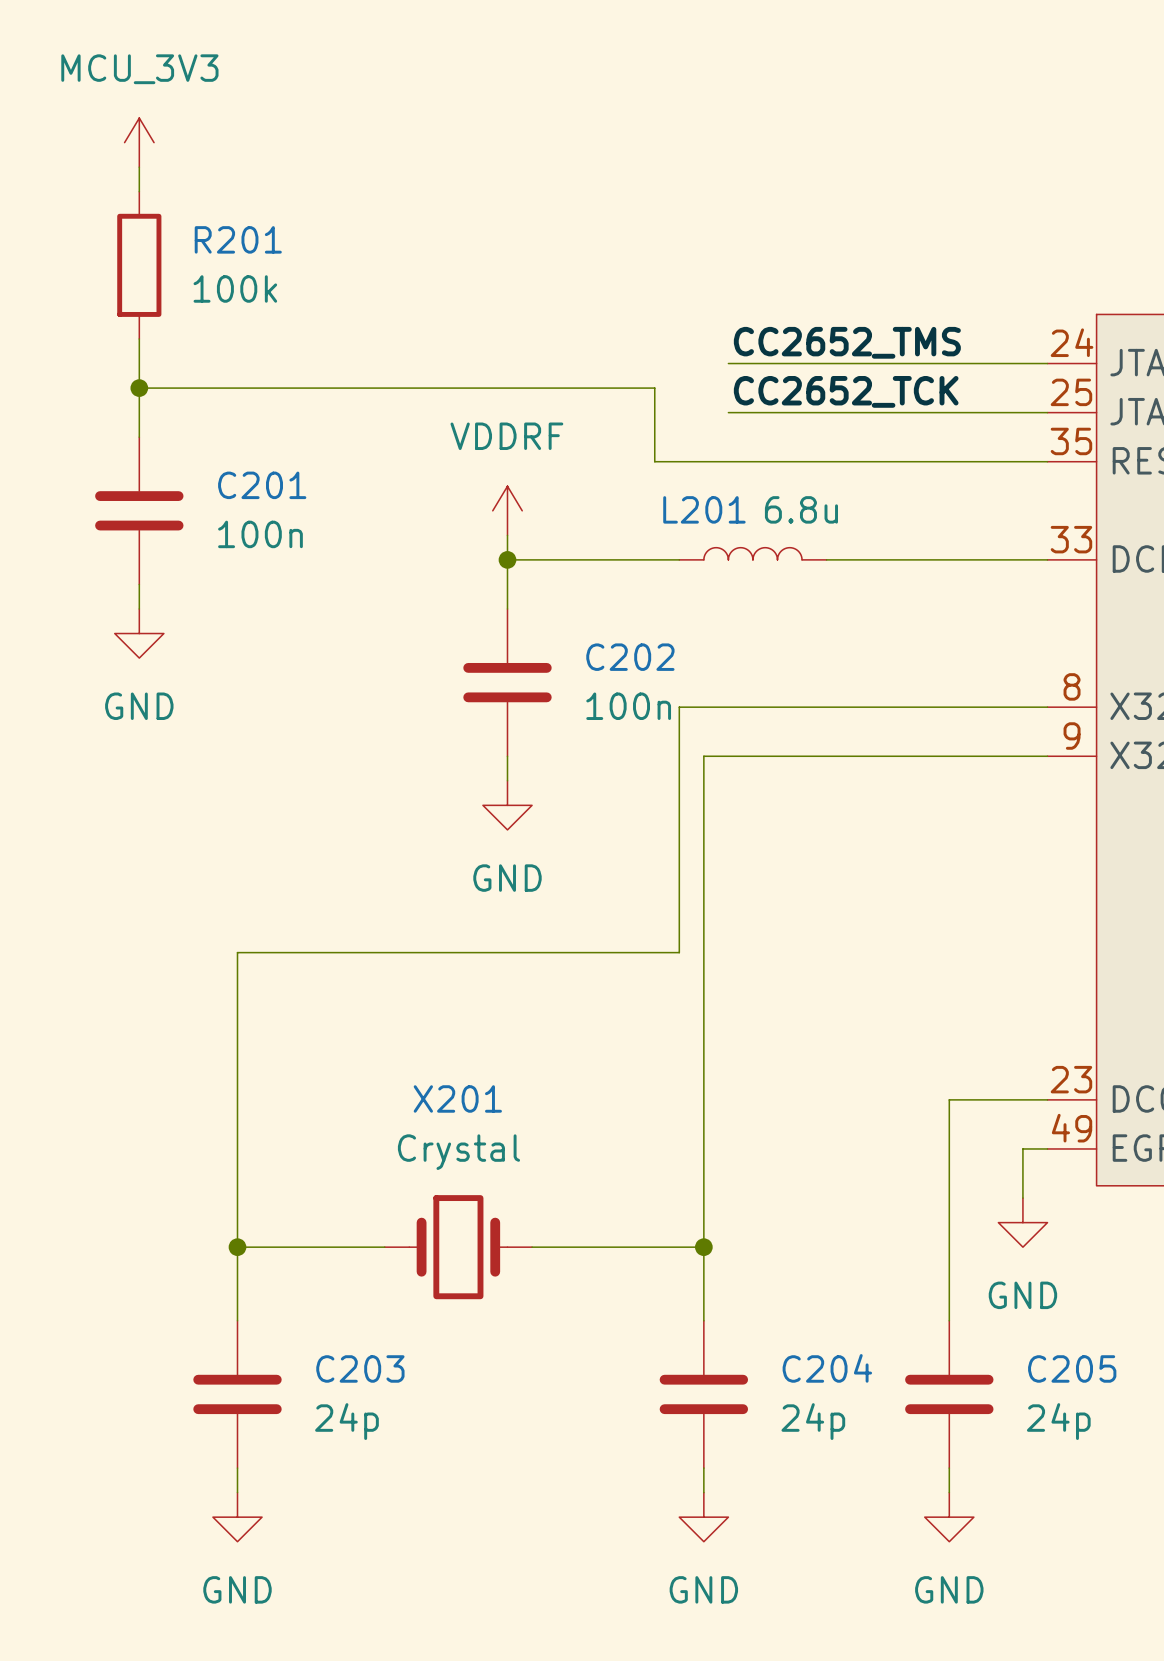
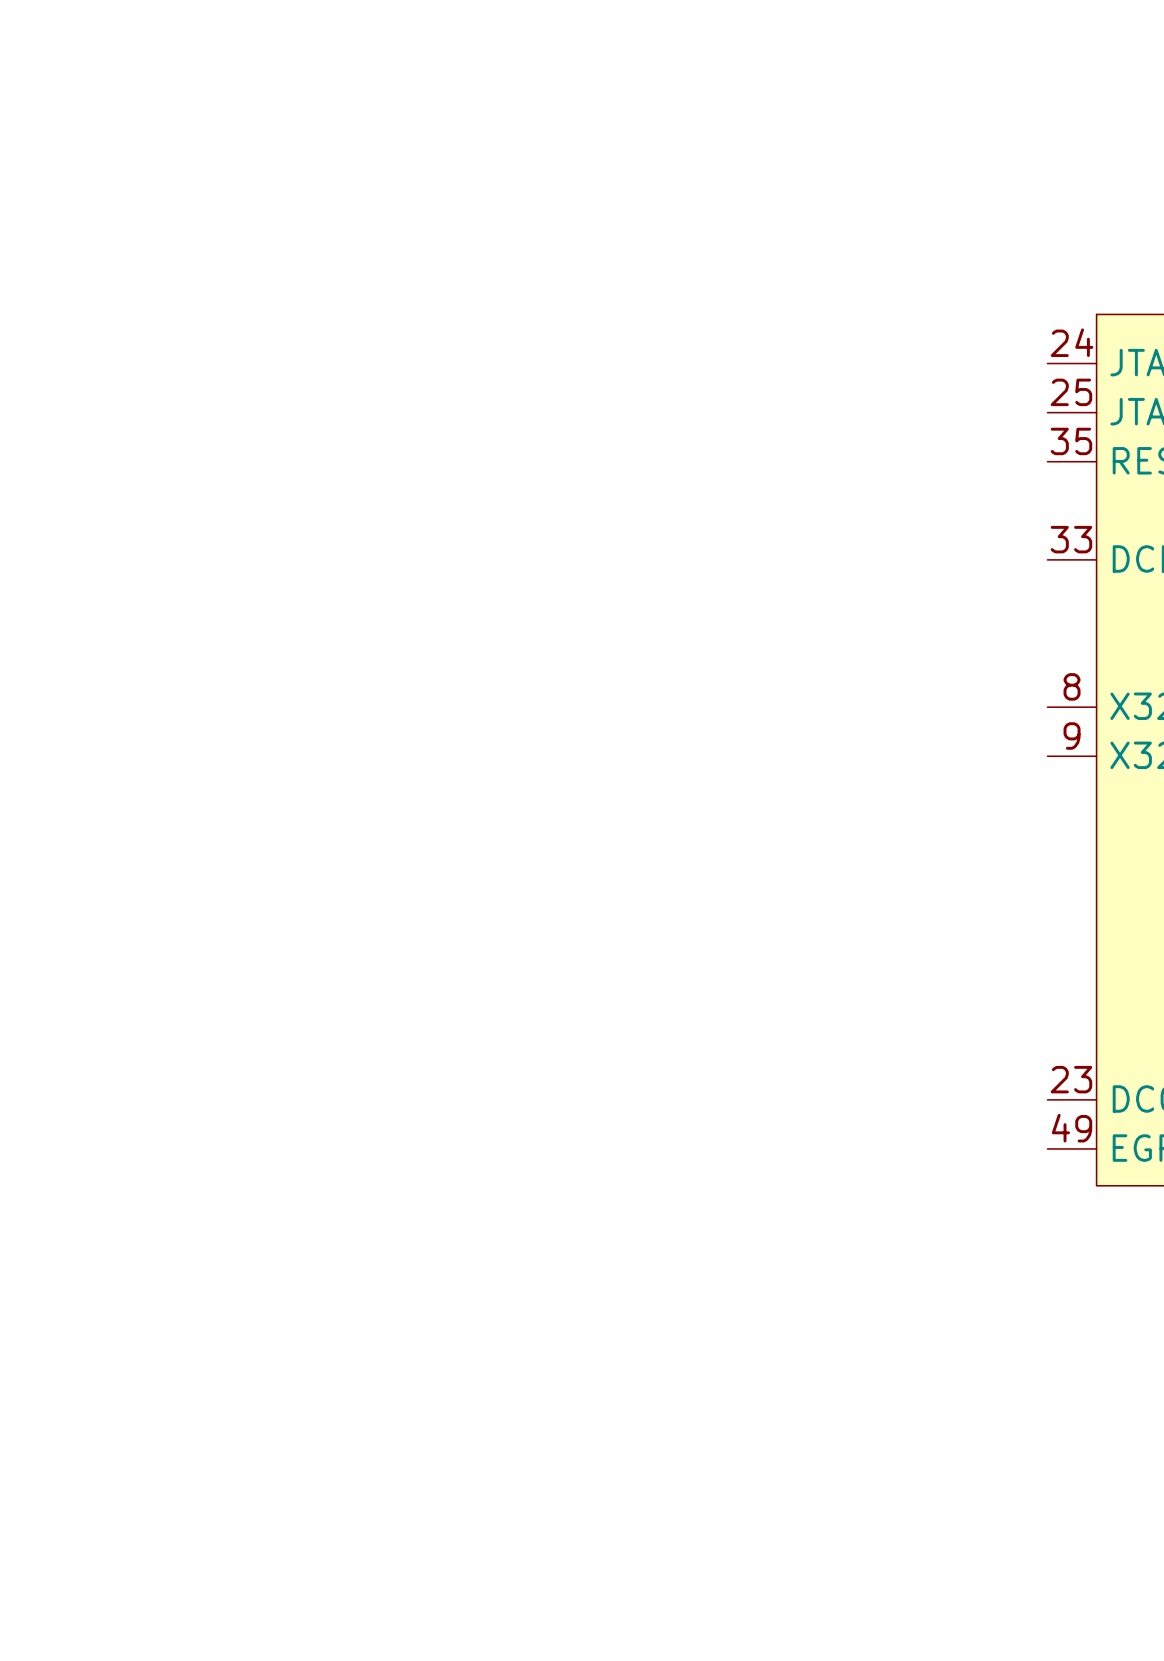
power symbol: MCU_3V3 (139, 142) -> none
wire: (139, 167) (139, 191) -> none
R201: 100k (139, 265) -> none
wire: (139, 338) (139, 437) -> none
label: CC2652_TMS (847, 342) -> none
wire: (728, 363) (1047, 363) -> none
wire: (139, 388) (654, 388) (654, 461) (1047, 461) -> none
junction: (139, 388) -> none
label: CC2652_TCK (846, 391) -> none
wire: (728, 412) (1047, 412) -> none
C201: 100n (139, 510) -> none
power symbol: VDDRF (507, 510) -> none
wire: (507, 535) (507, 608) -> none
L201: 6.8u (752, 553) -> none
wire: (507, 559) (679, 559) -> none
junction: (507, 559) -> none
wire: (826, 559) (1047, 559) -> none
wire: (139, 584) (139, 608) -> none
power symbol: GND (139, 633) -> none
C202: 100n (507, 682) -> none
wire: (1047, 707) (679, 707) (679, 952) (237, 952) (237, 1320) -> none
wire: (507, 756) (507, 780) -> none
wire: (1047, 756) (703, 756) (703, 1320) -> none
power symbol: GND (507, 805) -> none
wire: (1047, 1099) (949, 1099) (949, 1320) -> none
wire: (1047, 1148) (1022, 1148) (1022, 1198) -> none
power symbol: GND (1022, 1222) -> none
wire: (237, 1247) (384, 1247) -> none
junction: (237, 1247) -> none
X201: Crystal (458, 1247) -> none
wire: (532, 1247) (703, 1247) -> none
junction: (703, 1247) -> none
C203: 24p (237, 1394) -> none
C204: 24p (703, 1394) -> none
C205: 24p (949, 1394) -> none
wire: (237, 1468) (237, 1492) -> none
wire: (703, 1468) (703, 1492) -> none
wire: (949, 1468) (949, 1492) -> none
power symbol: GND (237, 1517) -> none
power symbol: GND (703, 1517) -> none
power symbol: GND (949, 1517) -> none

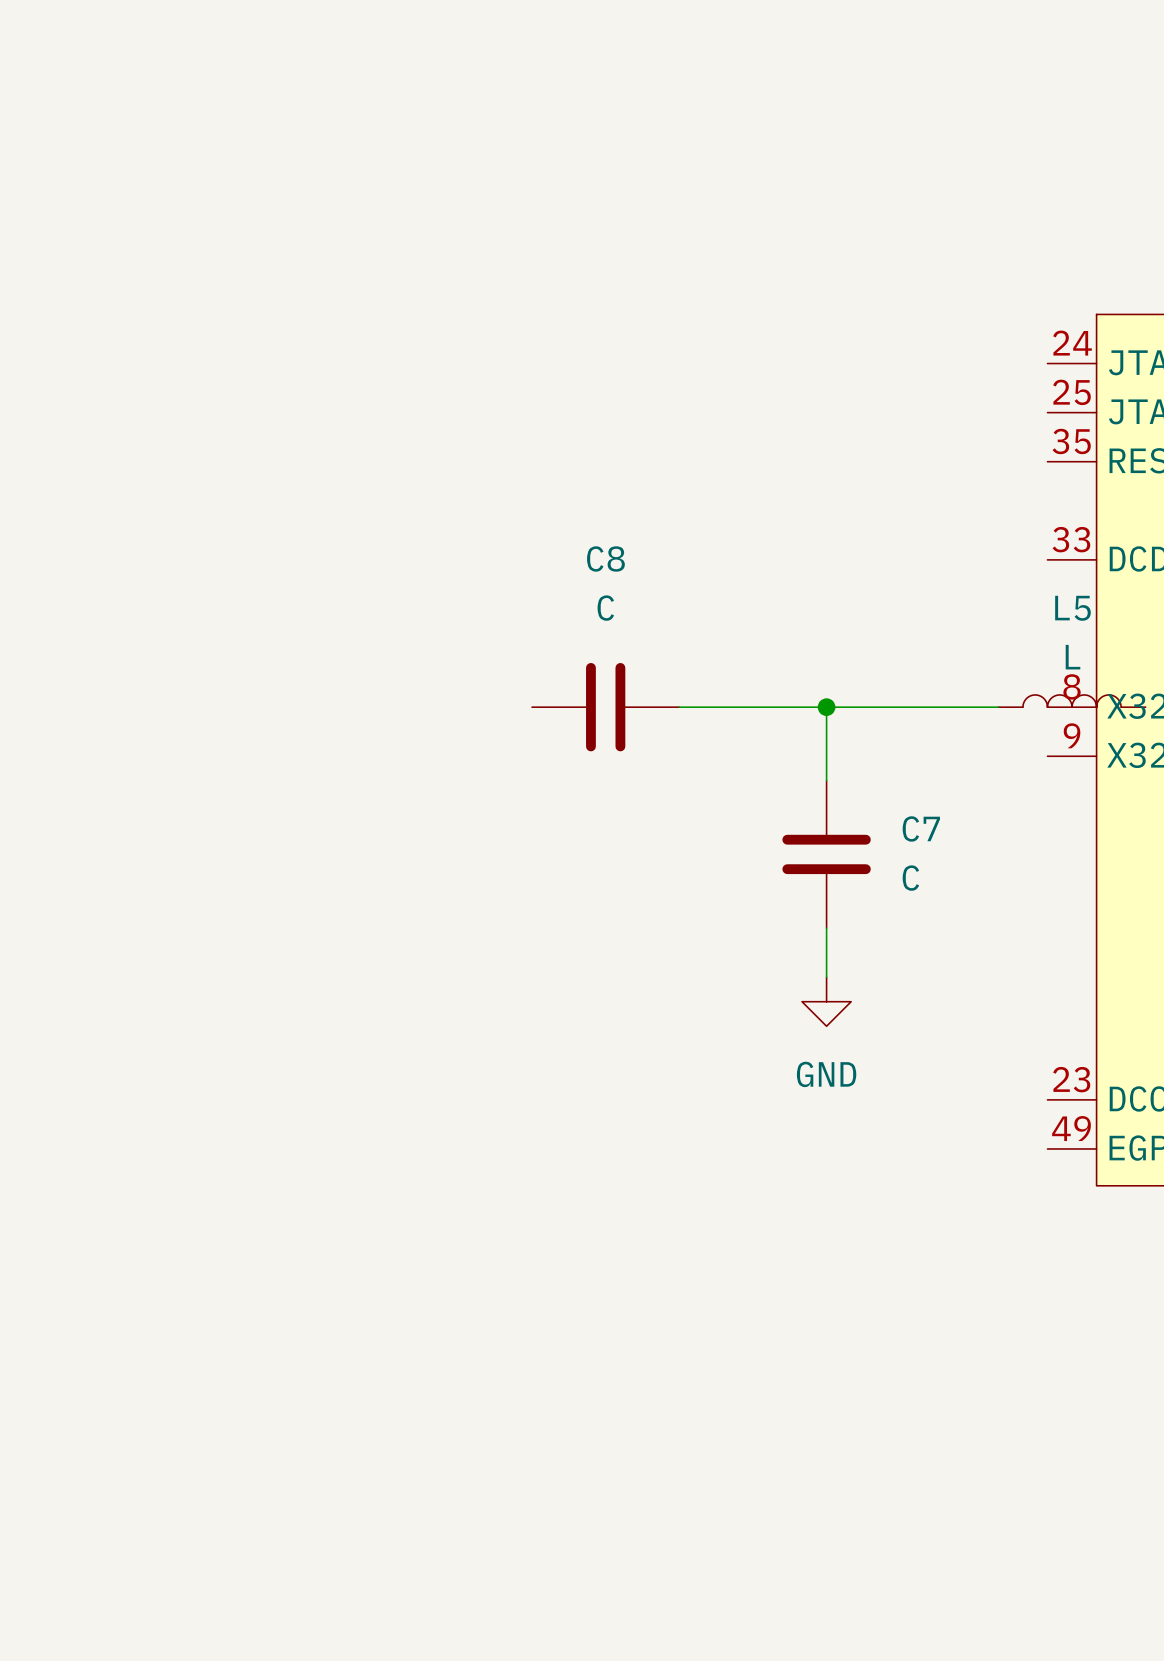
L5: none -> L (1072, 701)
C8: none -> C (605, 707)
wire: none -> (679, 707) (998, 707)
wire: none -> (826, 707) (826, 780)
junction: none -> (826, 707)
C7: none -> C (826, 854)
wire: none -> (826, 928) (826, 977)
power symbol: none -> GND (826, 1001)

